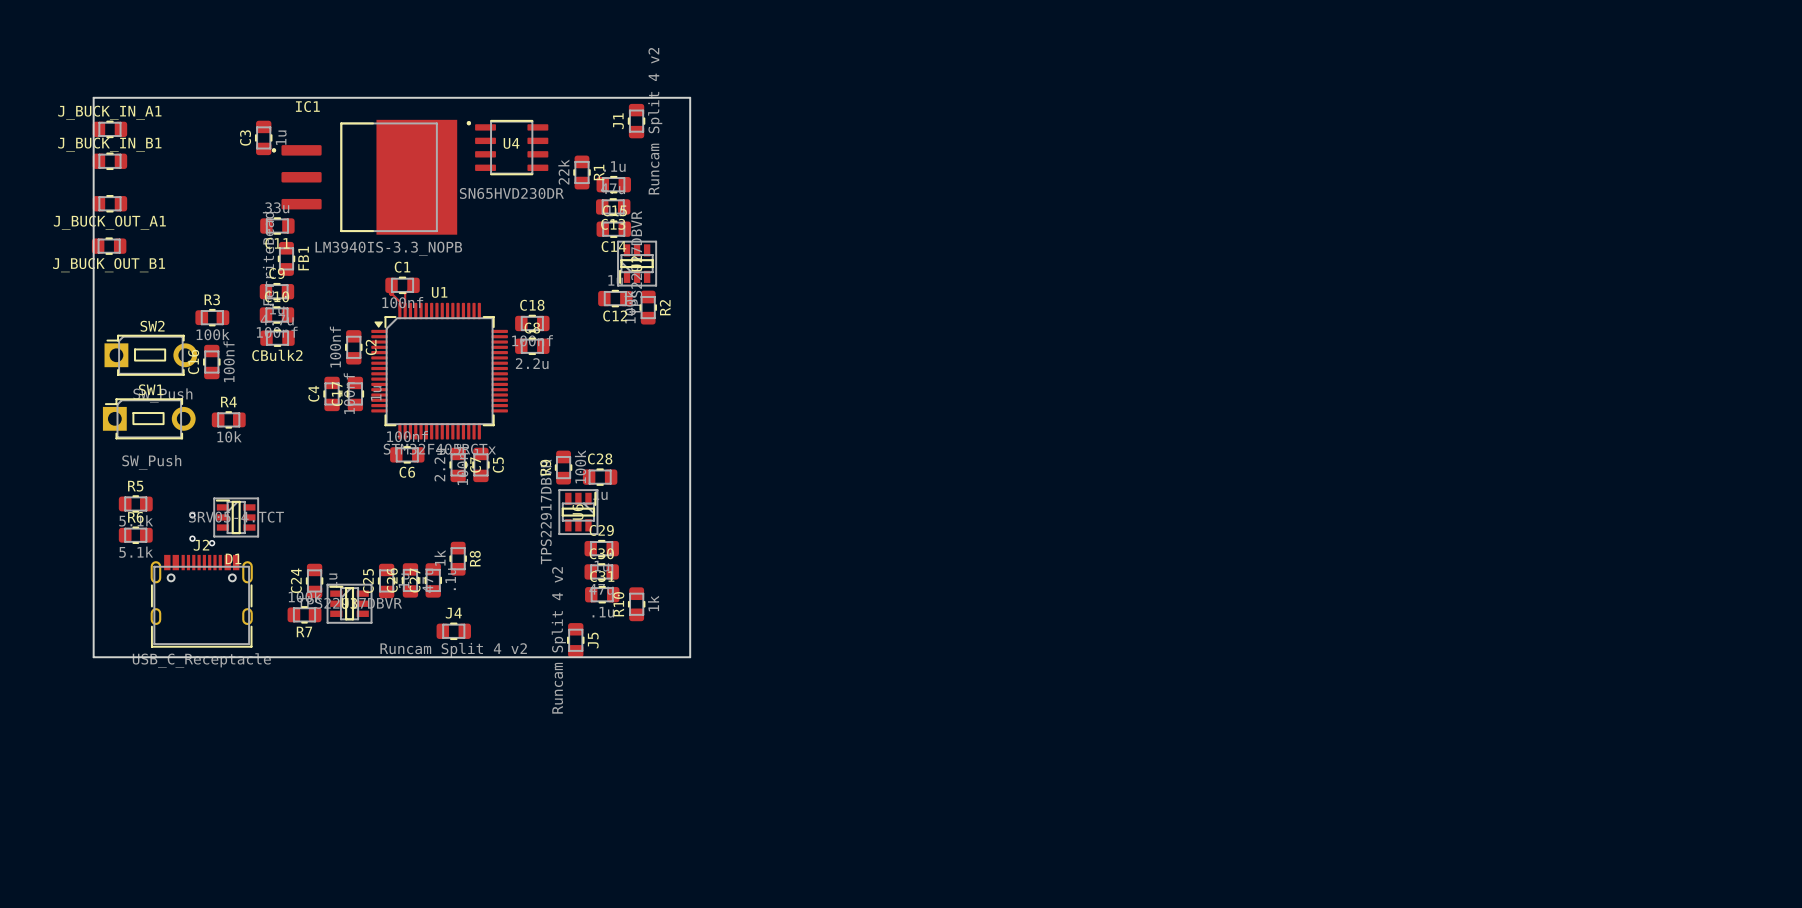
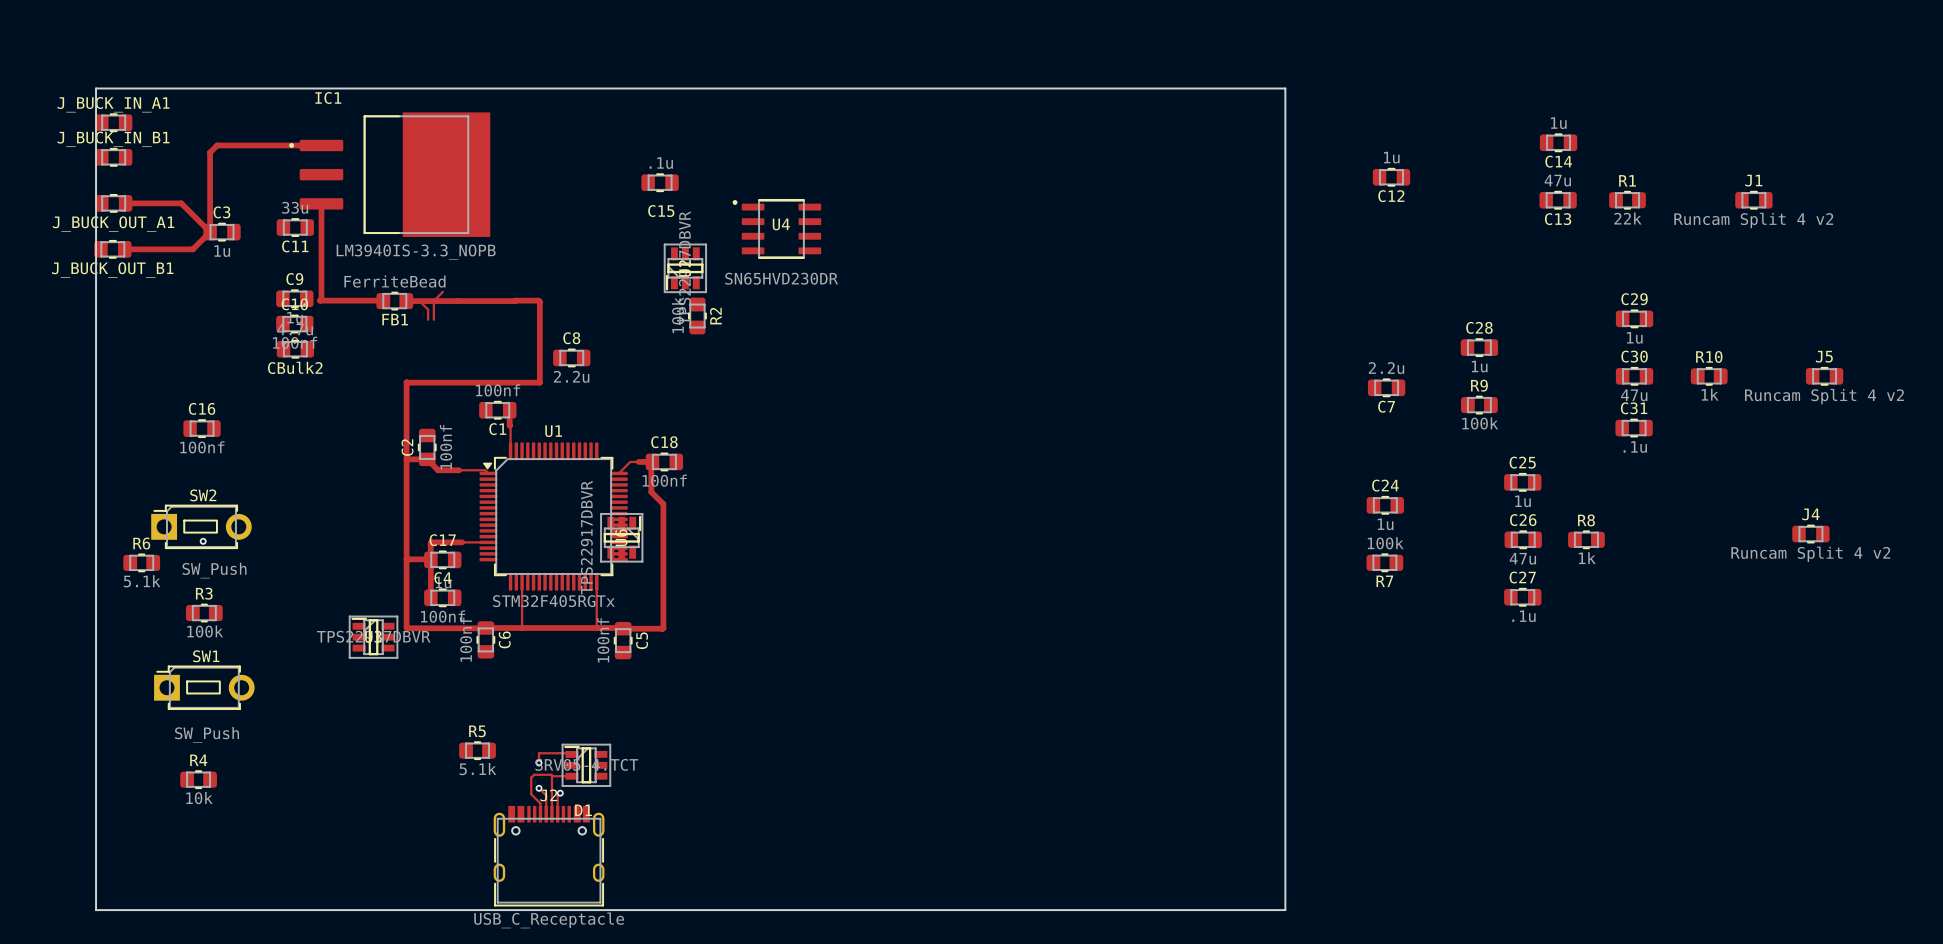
board edge: (690, 97) (690, 657) (93, 657) -> (742, 88) (1285, 88) (1285, 910) (96, 910) (96, 695)
J1 rotation: 0° (636, 121) -> 90° clockwise (1753, 200)
J1 position: (636, 121) -> (1753, 200)
C3 rotation: 0° (263, 137) -> 90° clockwise (222, 232)
C3 position: (263, 137) -> (222, 232)
U4 position: (507, 147) -> (776, 228)
track: none -> (321, 145) (217, 145) (210, 152) (210, 232)
R1 value position: 22k (563, 172) -> 22k (1627, 218)
R1 rotation: 0° (581, 172) -> 90° clockwise (1627, 200)
R1 position: (581, 172) -> (1627, 200)
R1 name position: R1 (599, 172) -> R1 (1627, 180)
track: none -> (125, 203) (181, 203) (210, 232)
track: none -> (321, 203) (320, 300) (383, 301)
C13 position: (613, 206) -> (1558, 200)
C14 position: (613, 229) -> (1558, 142)
track: none -> (210, 232) (192, 249) (124, 249)
FB1 rotation: 0° (286, 258) -> 90° clockwise (394, 301)
FB1 position: (286, 258) -> (394, 301)
C1 name position: C1 (402, 267) -> C1 (497, 429)
C1 position: (402, 285) -> (497, 410)
track: none -> (406, 301) (539, 301) (539, 382) (406, 382) (406, 627) (622, 627)
C12 position: (615, 298) -> (1391, 177)
C1 value position: 100nf (402, 302) -> 100nf (498, 390)
R3 position: (212, 317) -> (204, 613)
C18 position: (532, 323) -> (664, 461)
C2 value position: 100nf (335, 347) -> 100nf (446, 447)
C2 position: (353, 347) -> (427, 447)
C2 name position: C2 (371, 347) -> C2 (407, 447)
SW2 position: (150, 355) -> (201, 526)
C16 rotation: 0° (211, 362) -> 90° clockwise (202, 428)
C16 position: (211, 362) -> (202, 428)
U1 position: (439, 371) -> (553, 516)
C4 rotation: 0° (332, 393) -> 90° clockwise (442, 597)
C4 position: (332, 393) -> (442, 597)
C17 rotation: 0° (355, 393) -> 90° clockwise (442, 559)
C17 position: (355, 393) -> (442, 559)
track: none -> (509, 410) (510, 451)
SW1 position: (149, 418) -> (204, 687)
R4 position: (228, 419) -> (198, 779)
C6 value position: 100nf (407, 436) -> 100nf (466, 639)
track: none -> (406, 459) (427, 459) (438, 470) (485, 470) (488, 473)
track: none -> (618, 473) (630, 461) (652, 461) (651, 492) (663, 504) (662, 629)
C6 rotation: 0° (407, 454) -> 90° clockwise (485, 639)
C6 position: (407, 454) -> (485, 639)
C7 rotation: 0° (458, 464) -> 90° clockwise (1386, 387)
C7 position: (458, 464) -> (1386, 387)
C5 position: (480, 464) -> (623, 640)
R9 rotation: 0° (563, 467) -> 90° clockwise (1479, 405)
R9 position: (563, 467) -> (1479, 405)
C6 name position: C6 (407, 472) -> C6 (504, 639)
C28 position: (600, 477) -> (1479, 347)
R5 position: (135, 503) -> (477, 750)
track: none -> (488, 542) (431, 542) (430, 559)
D1 position: (236, 517) -> (586, 765)
track: none -> (406, 559) (430, 559)
track: none -> (430, 559) (430, 597)
via: (192, 538) -> none
via: (212, 543) -> none
C29 position: (601, 548) -> (1634, 318)
track: none -> (522, 581) (522, 627)
track: none -> (596, 581) (596, 627)
R8 value position: 1k (440, 557) -> 1k (1587, 558)
R8 rotation: 0° (458, 558) -> 90° clockwise (1586, 539)
R8 position: (458, 558) -> (1586, 539)
R8 name position: R8 (475, 558) -> R8 (1586, 520)
C30 position: (601, 571) -> (1634, 376)
C24 rotation: 0° (314, 580) -> 90° clockwise (1385, 505)
C24 position: (314, 580) -> (1385, 505)
C25 rotation: 0° (386, 580) -> 90° clockwise (1522, 482)
C25 position: (386, 580) -> (1522, 482)
C26 rotation: 0° (410, 580) -> 90° clockwise (1523, 539)
C26 position: (410, 580) -> (1523, 539)
C27 rotation: 0° (433, 580) -> 90° clockwise (1522, 597)
C27 position: (433, 580) -> (1522, 597)
track: none -> (620, 625) (623, 628) (662, 628)
C31 position: (602, 594) -> (1634, 428)
J2 position: (201, 601) -> (549, 856)
R10 rotation: 0° (636, 604) -> 90° clockwise (1709, 376)
R10 position: (636, 604) -> (1709, 376)
R7 position: (304, 614) -> (1384, 562)
J4 position: (453, 631) -> (1810, 534)
J5 value position: Runcam Split 4 v2 (558, 640) -> Runcam Split 4 v2 (1824, 396)
J5 rotation: 0° (575, 640) -> 90° clockwise (1824, 376)
J5 position: (575, 640) -> (1824, 376)
J5 name position: J5 (593, 640) -> J5 (1824, 356)
track: none -> (572, 754) (539, 753) (539, 763)
via: none -> (539, 763)
track: none -> (551, 775) (551, 814)
track: none -> (572, 776) (534, 774) (531, 777) (531, 794) (540, 803) (540, 814)
track: none -> (539, 788) (546, 795) (546, 814)
via: none -> (539, 788)
track: none -> (560, 793) (557, 795) (557, 814)
via: none -> (560, 793)

